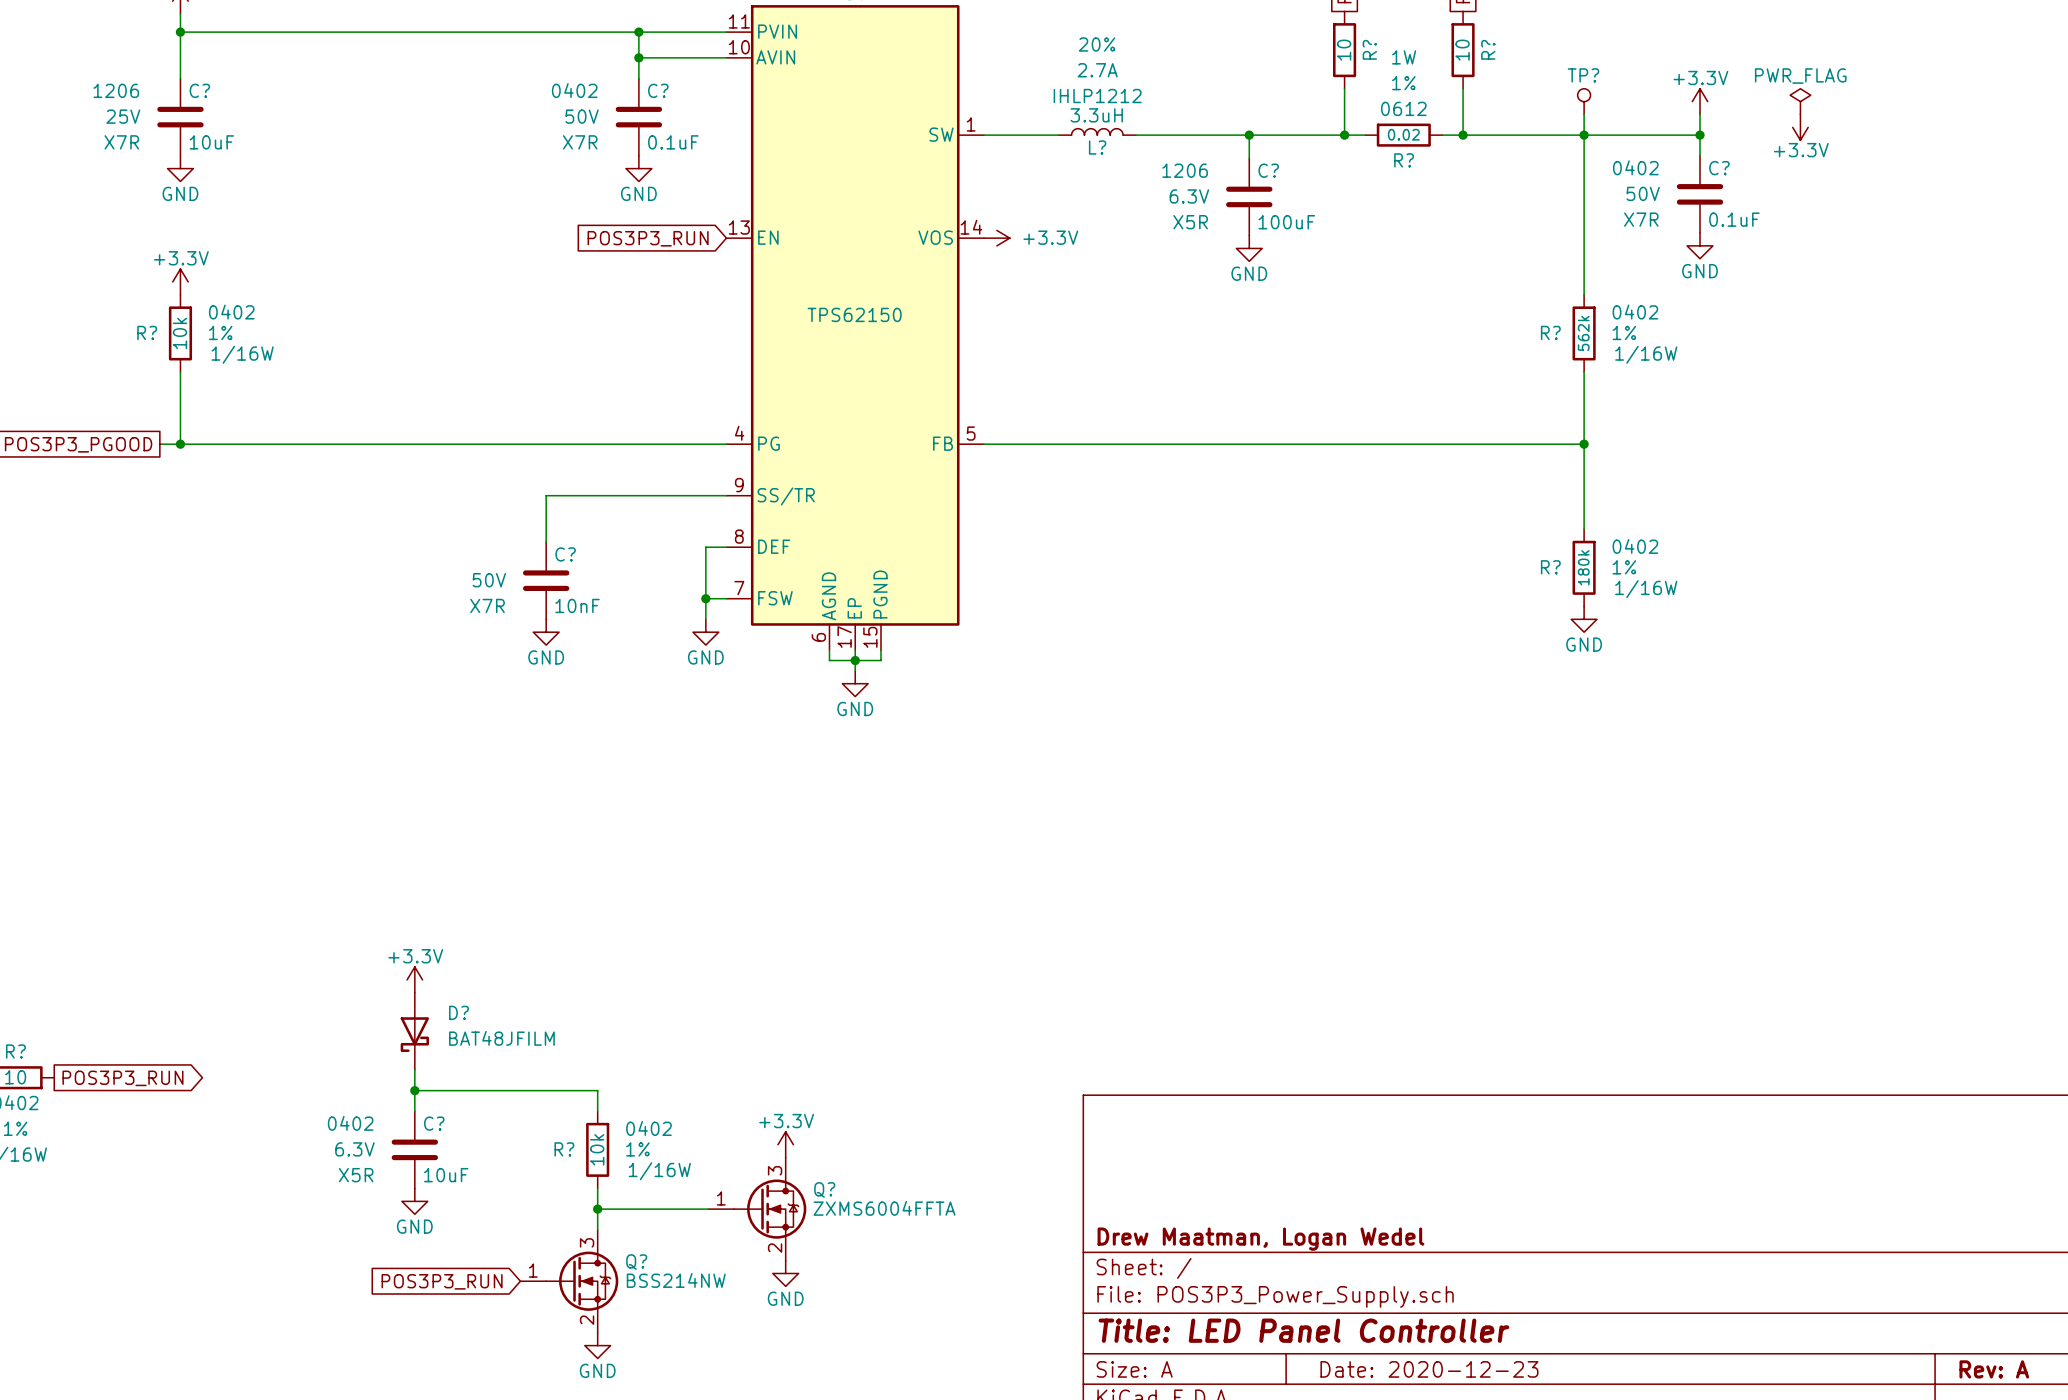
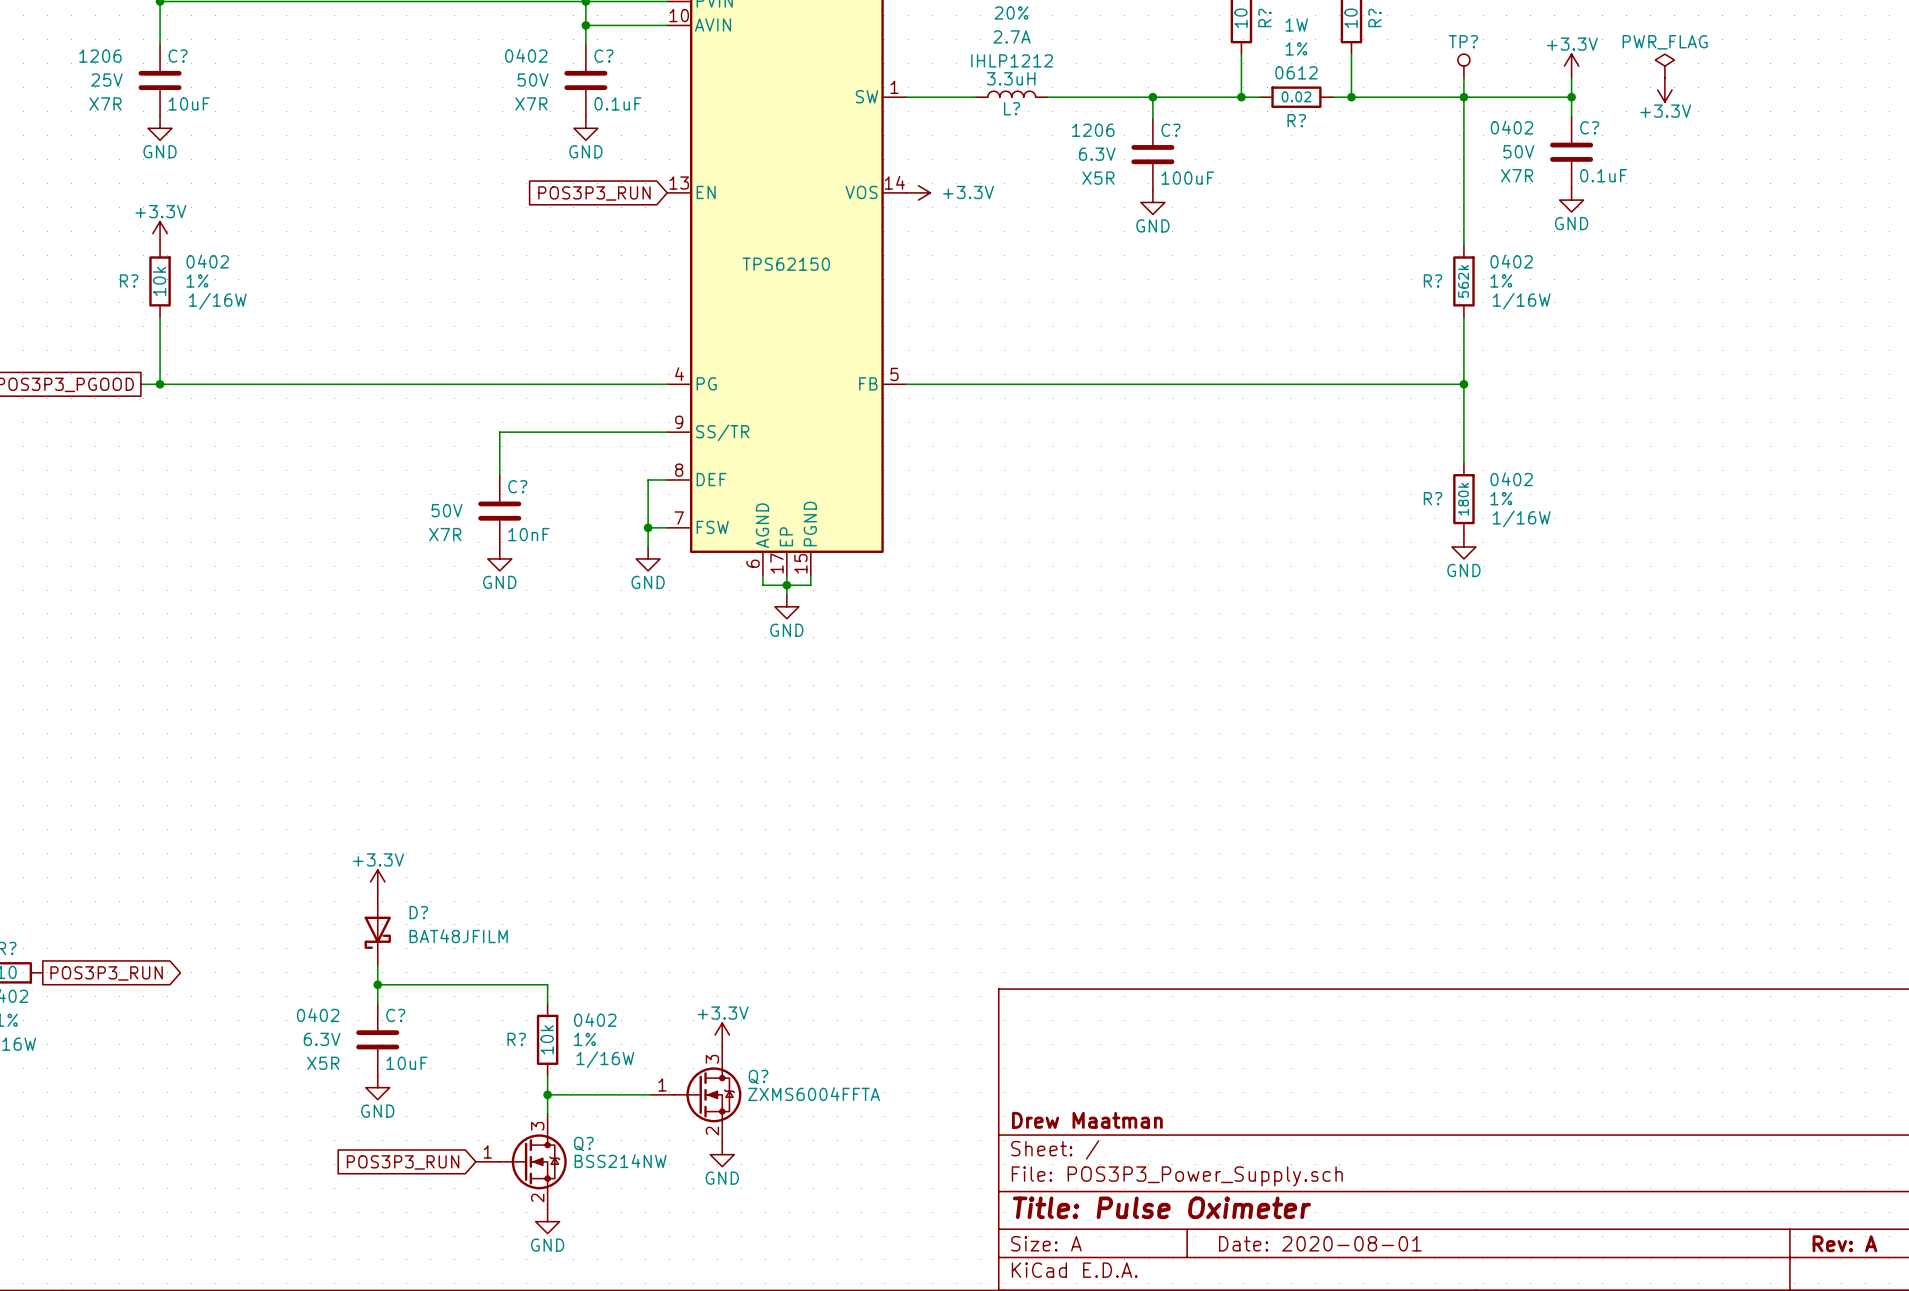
title block: Drew Maatman, Logan Wedel (1260, 1239) -> Drew Maatman (1087, 1120)
title block: Title: LED Panel Controller (1303, 1330) -> Title: Pulse Oximeter (1161, 1207)
title block: Date: 2020-12-23 (1429, 1369) -> Date: 2020-08-01 (1320, 1243)

